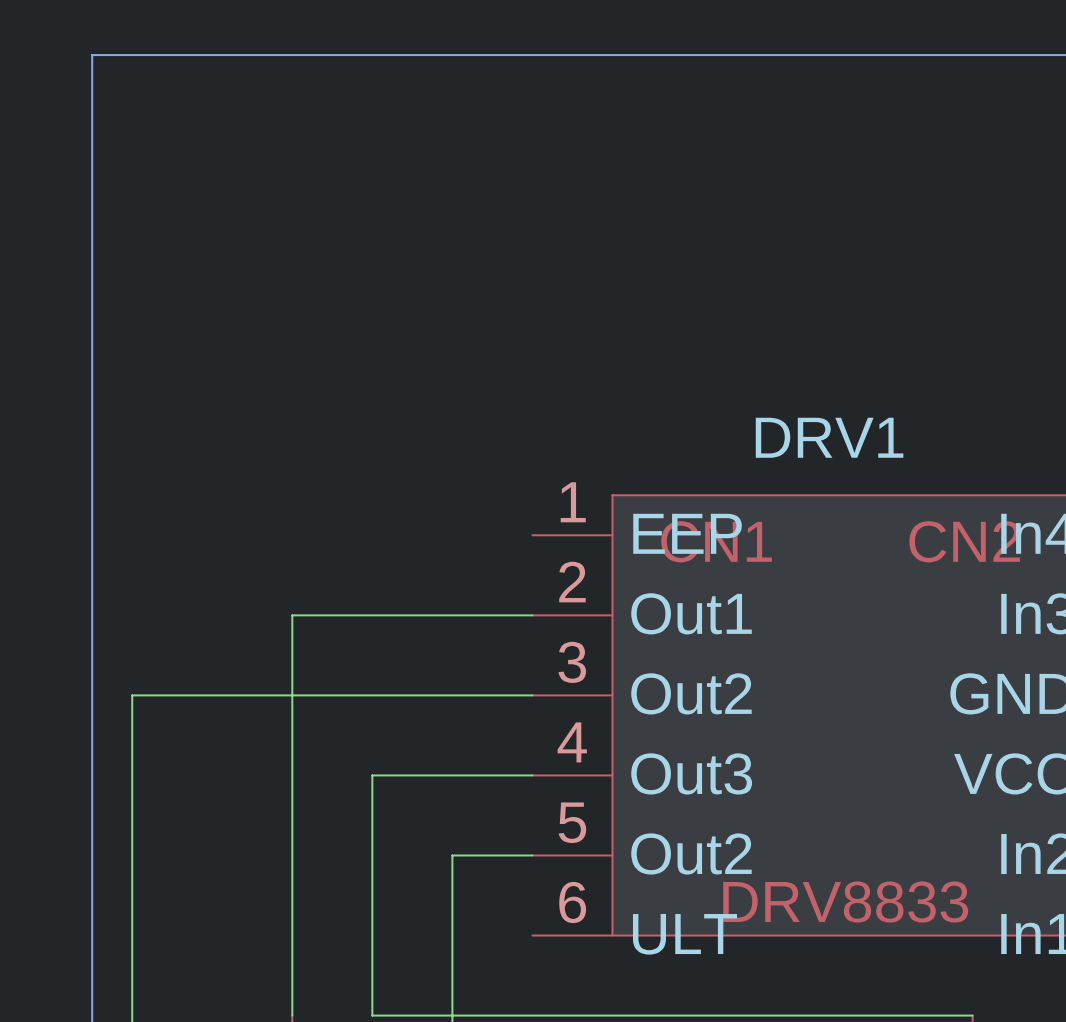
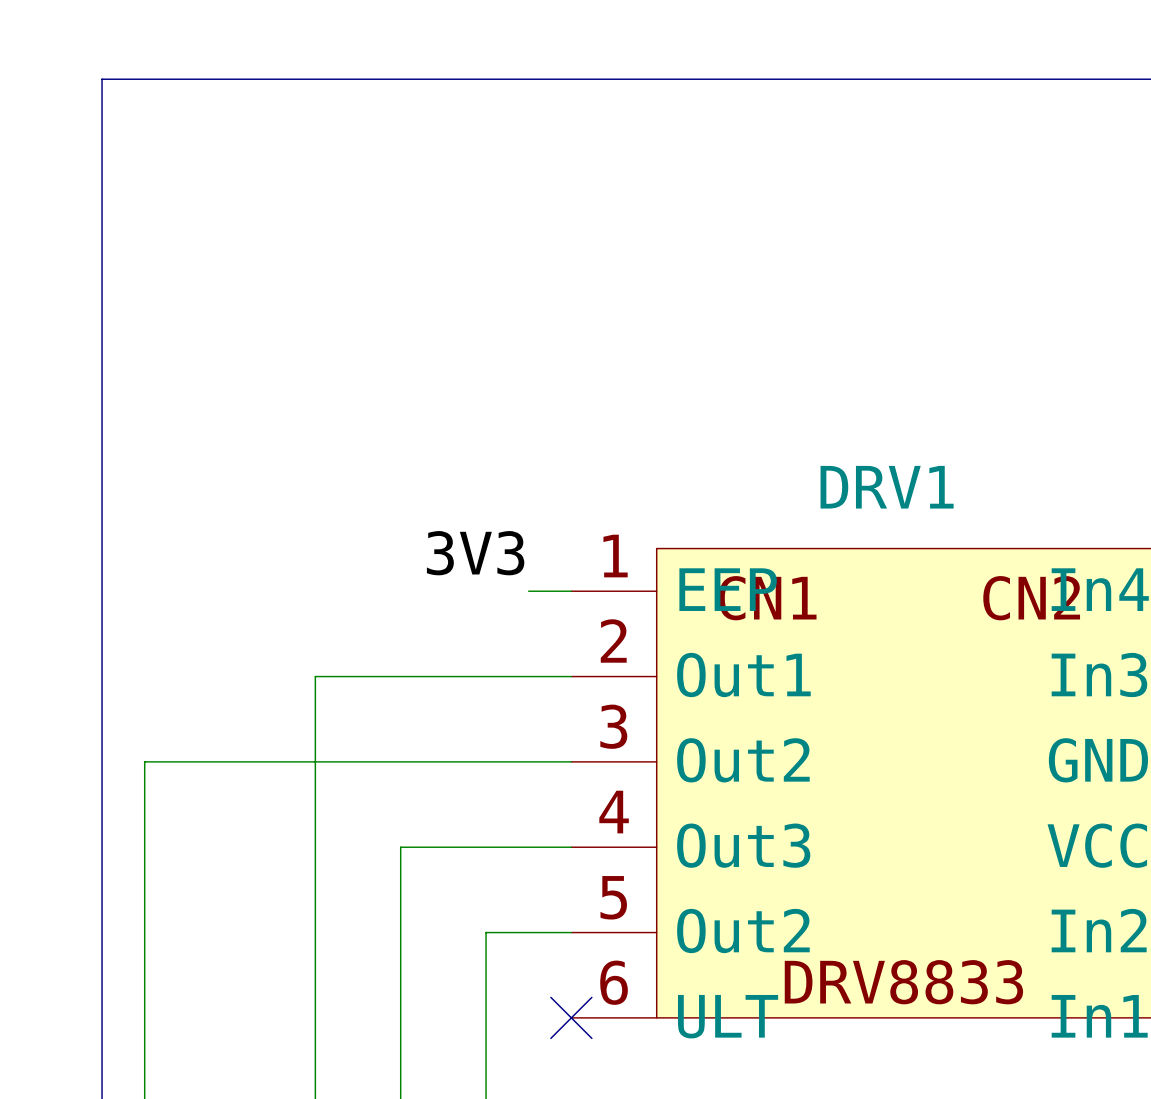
label: none -> 3V3 (475, 553)
wire: none -> (528, 591) (571, 591)
no-connect mark: none -> (571, 1017)

